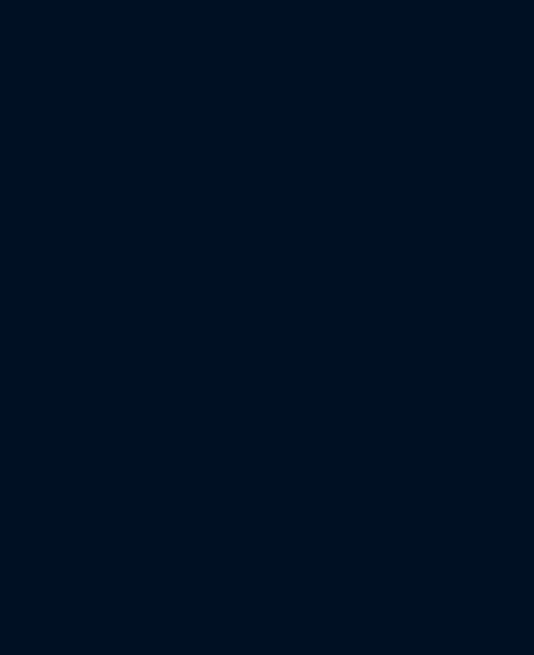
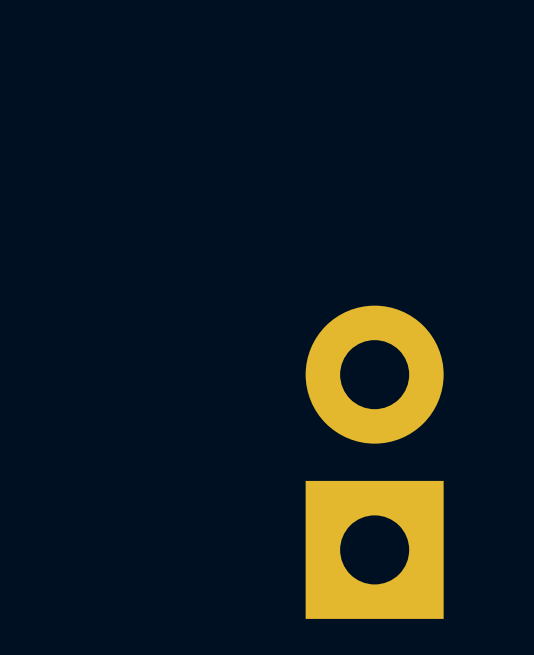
part: none -> (374, 462)

